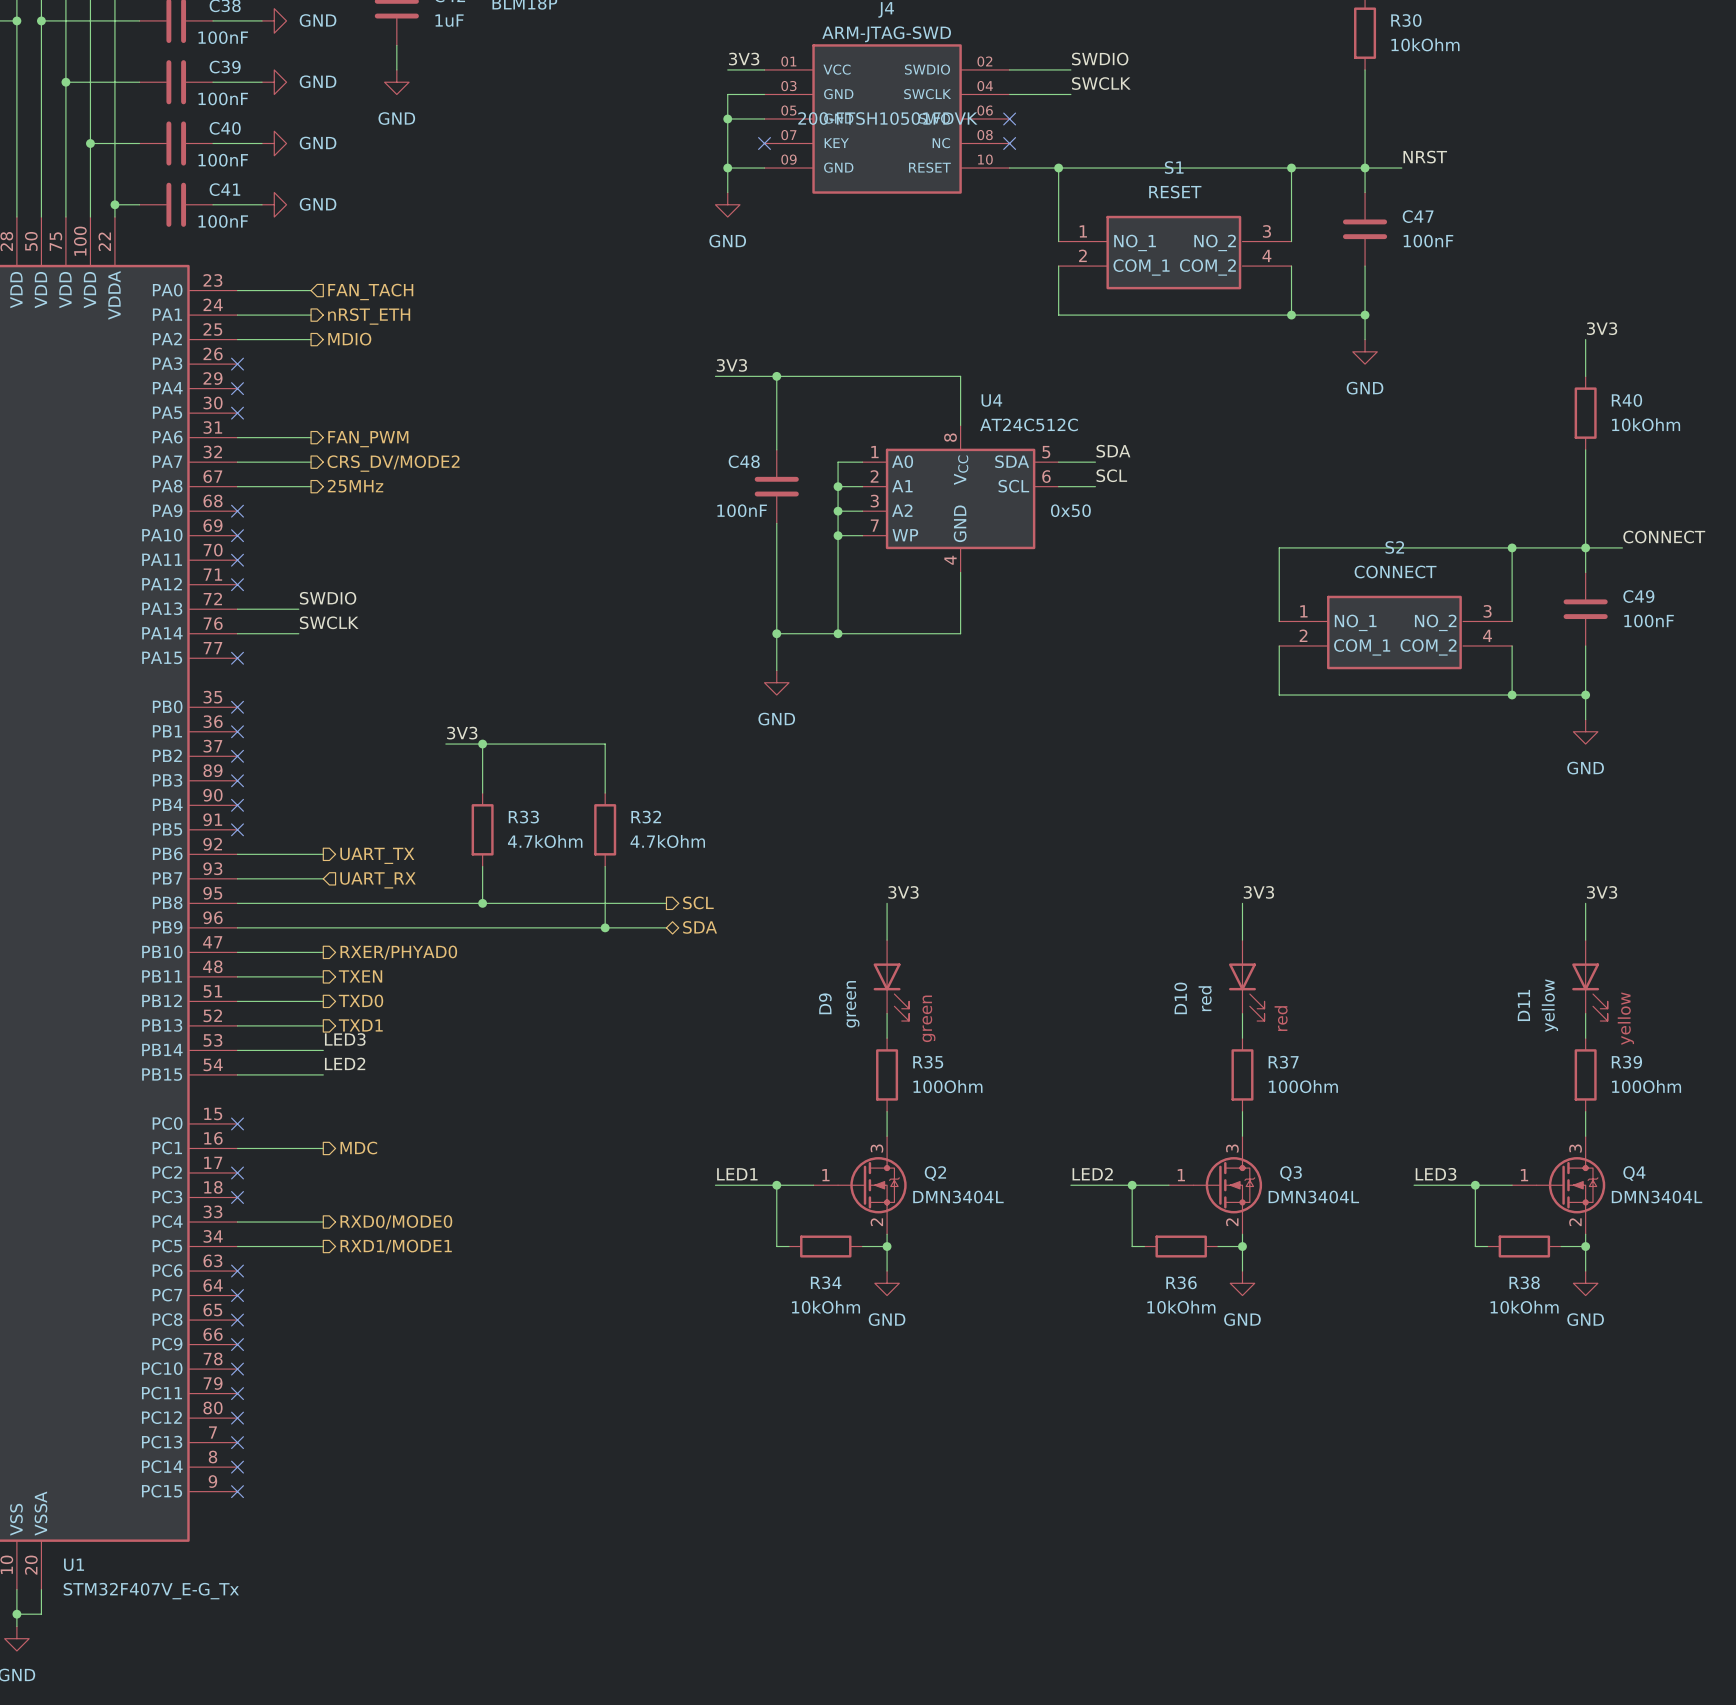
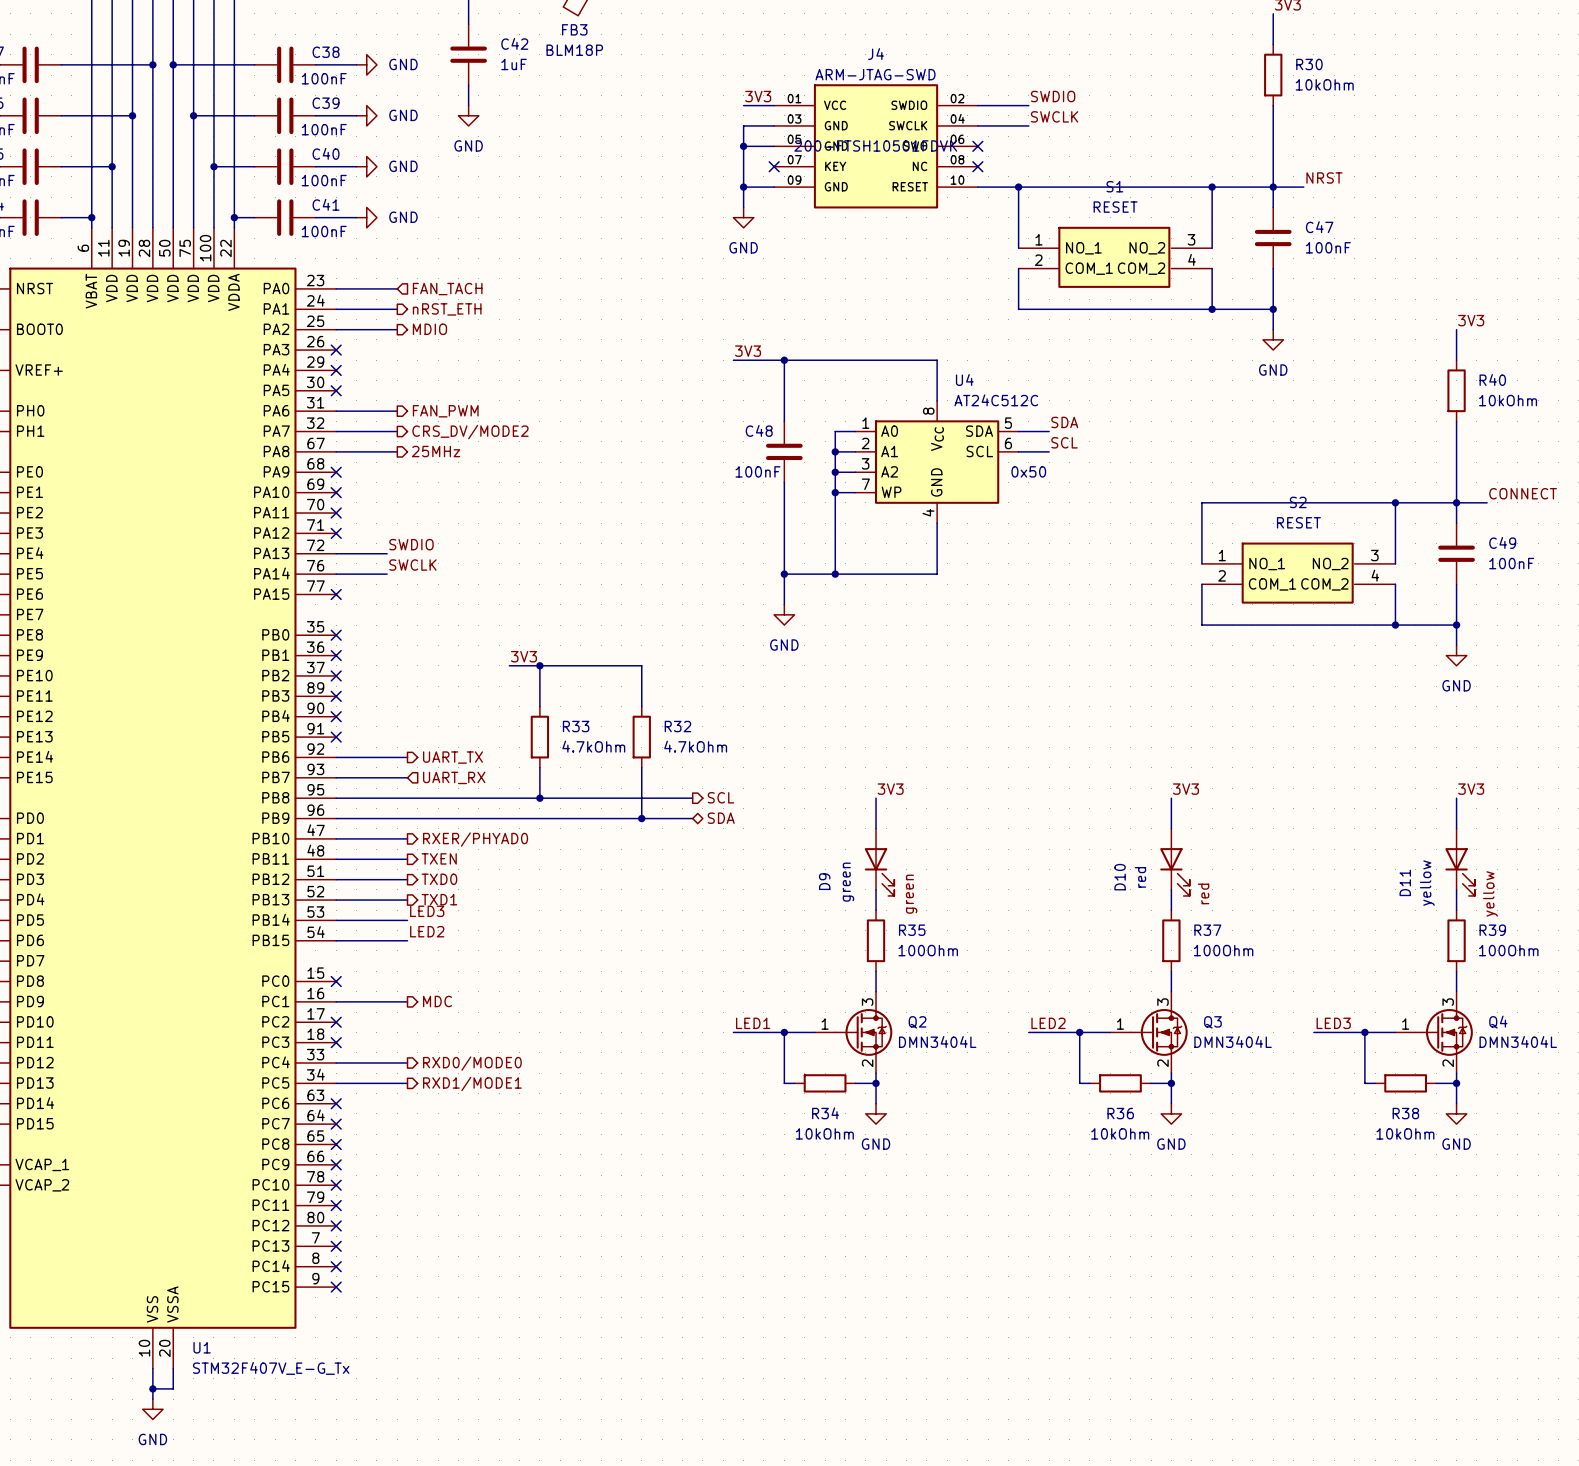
S2 value: CONNECT (1395, 572) -> RESET (1298, 522)

